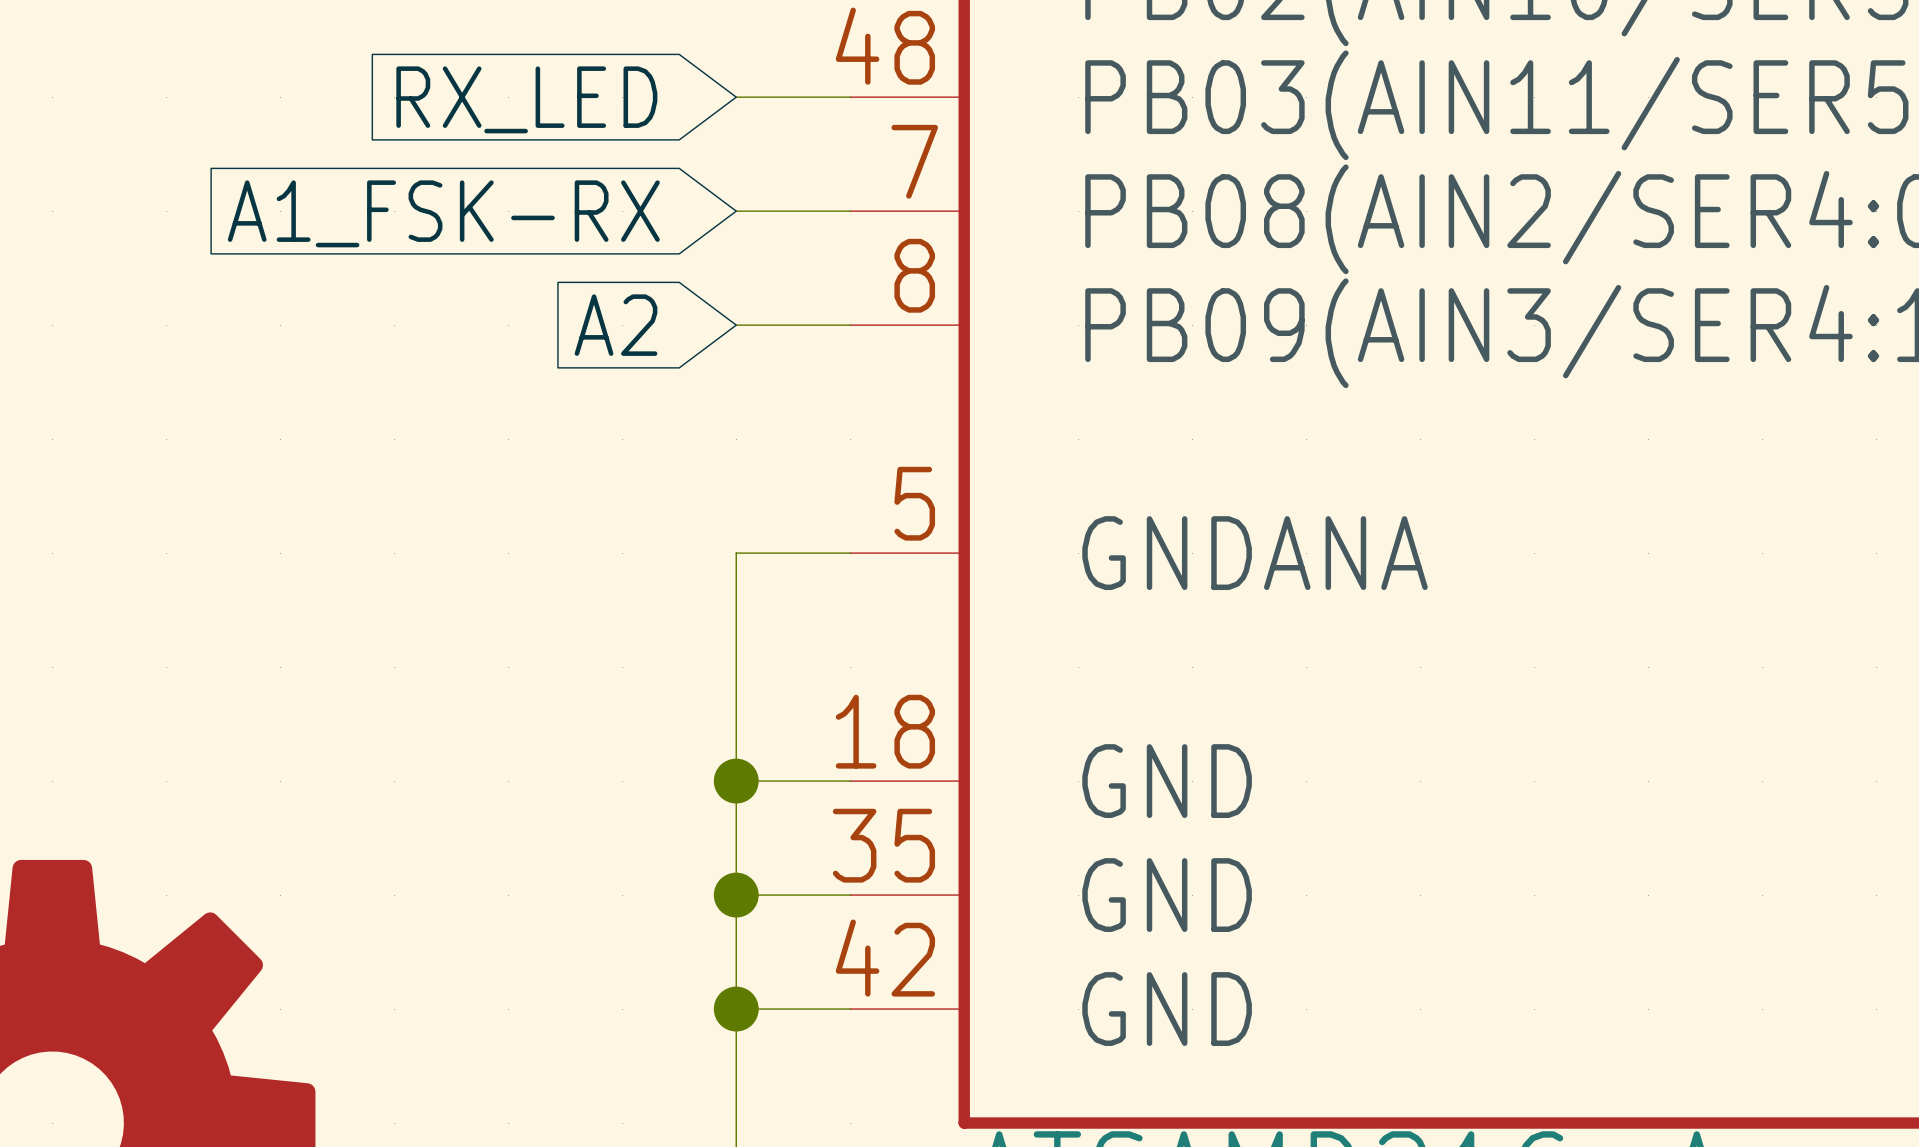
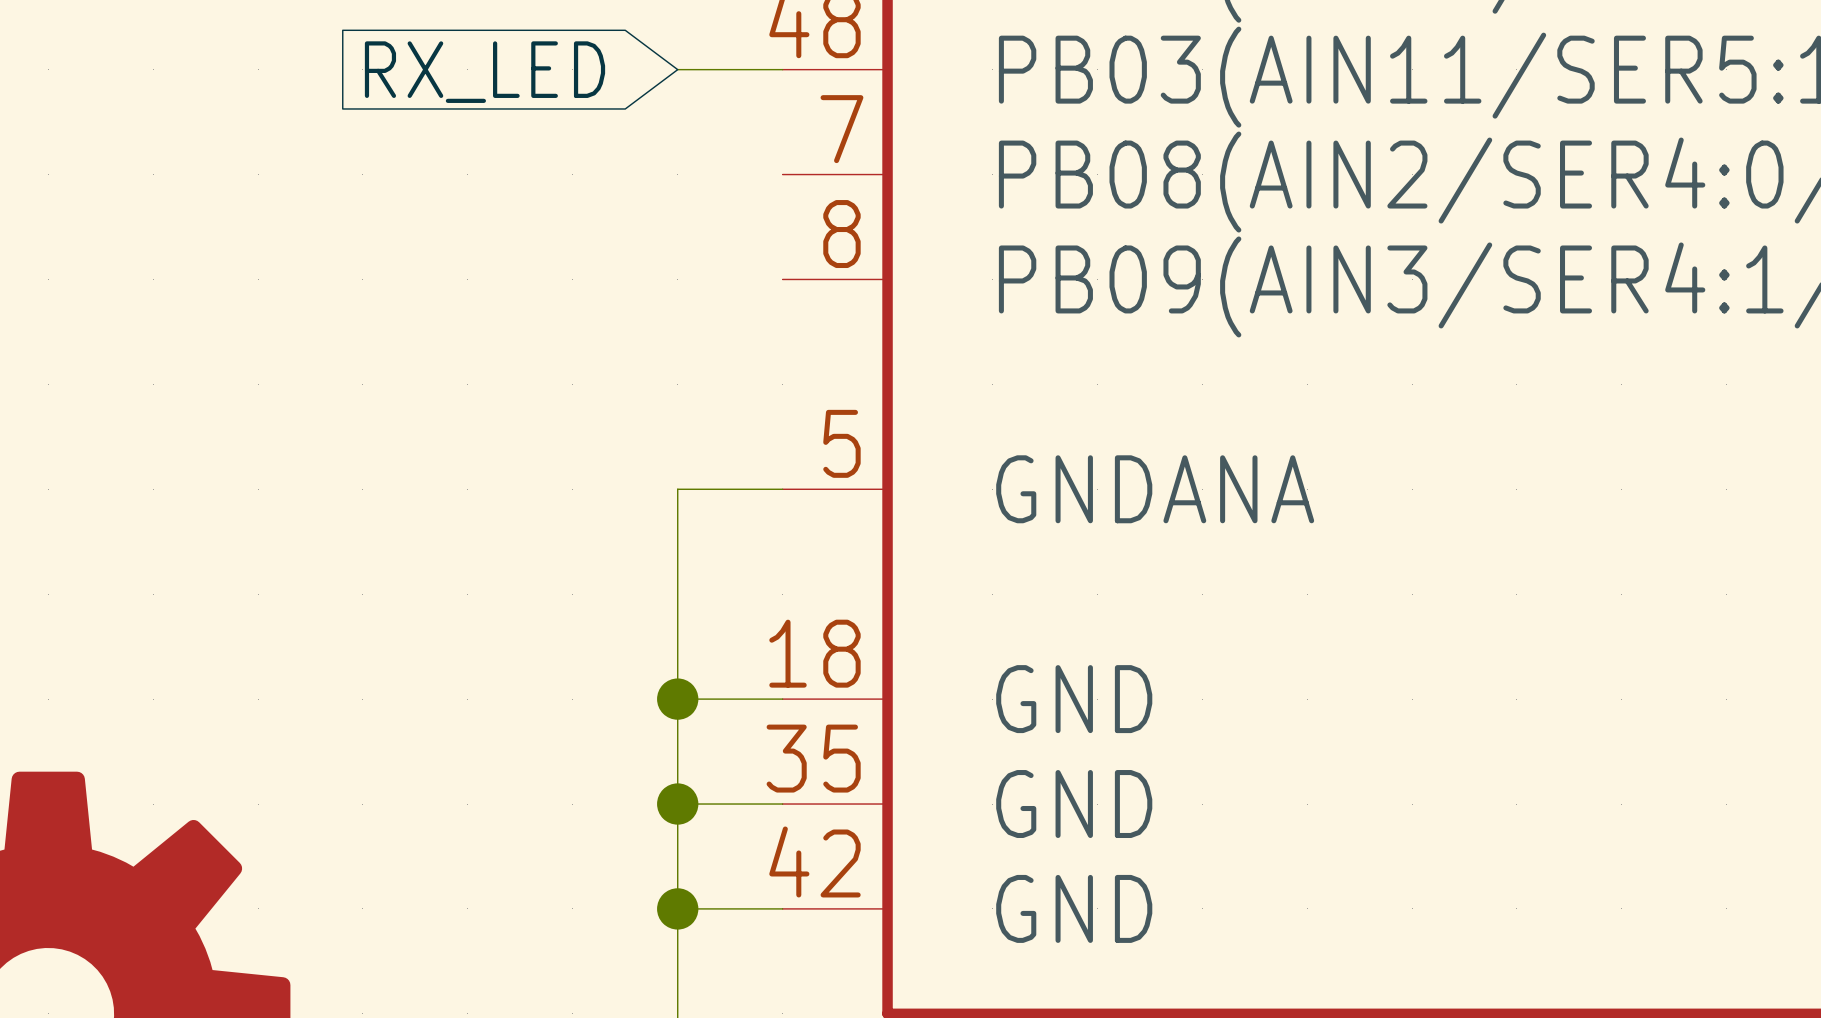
wire: (736, 211) (850, 211) -> none
global label: A1_FSK-RX (443, 213) -> none
global label: A2 (616, 325) -> none
wire: (736, 325) (850, 325) -> none

